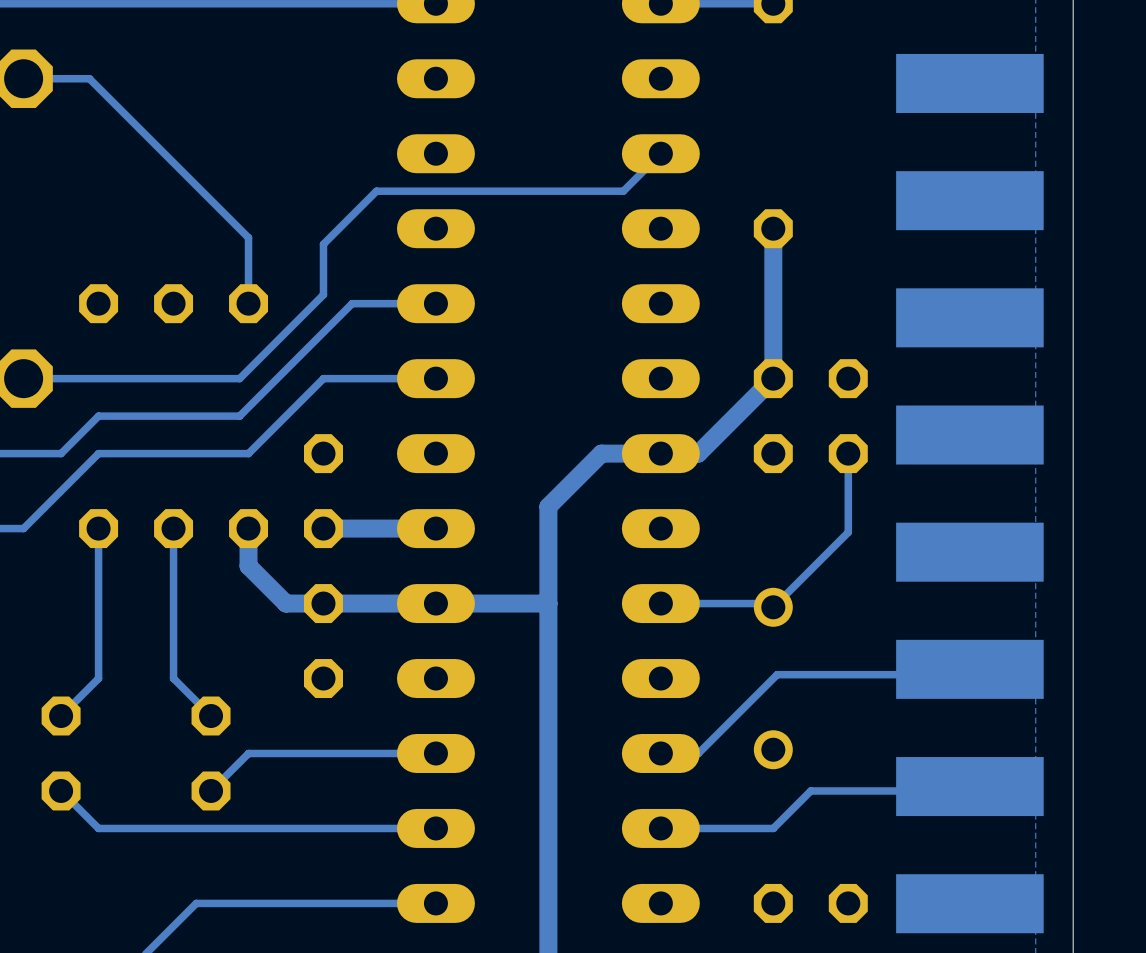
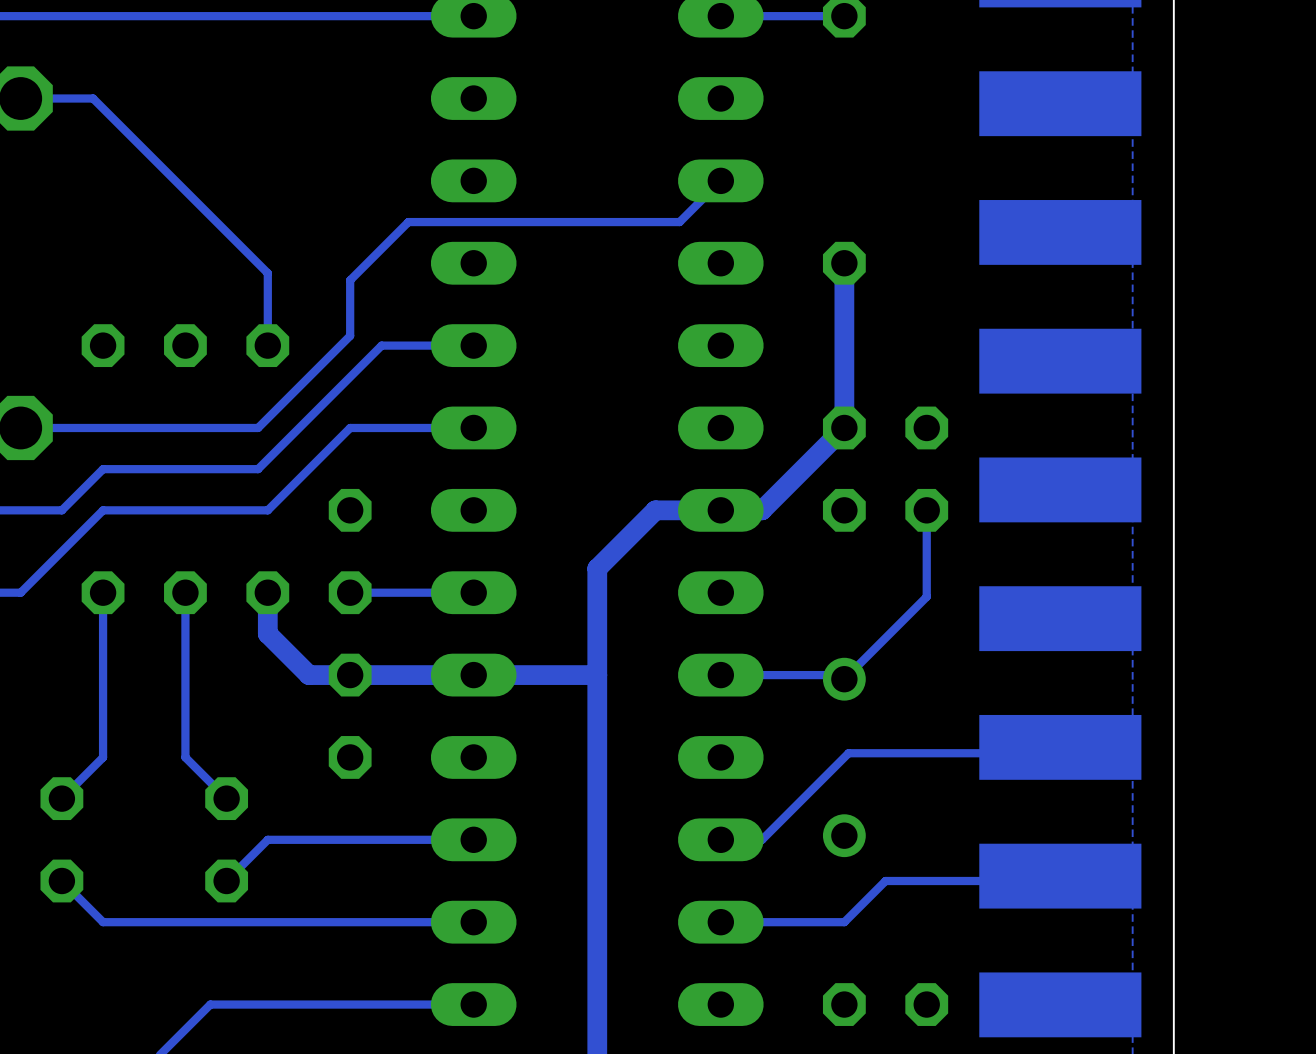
track width: thick (435, 528) (323, 528) -> thin (473, 592) (350, 592)

